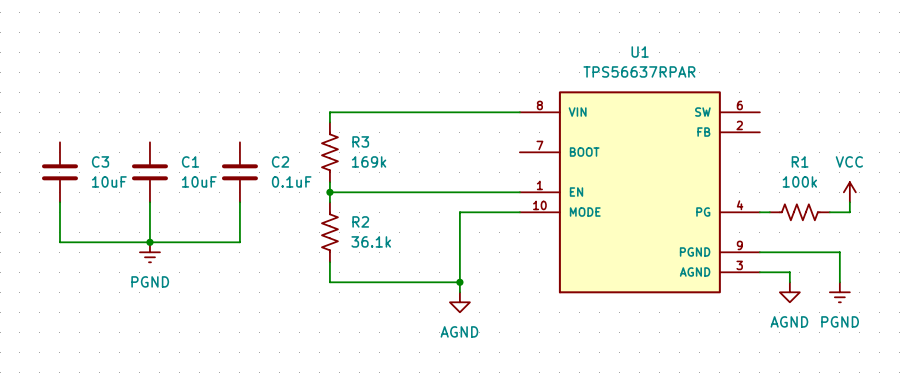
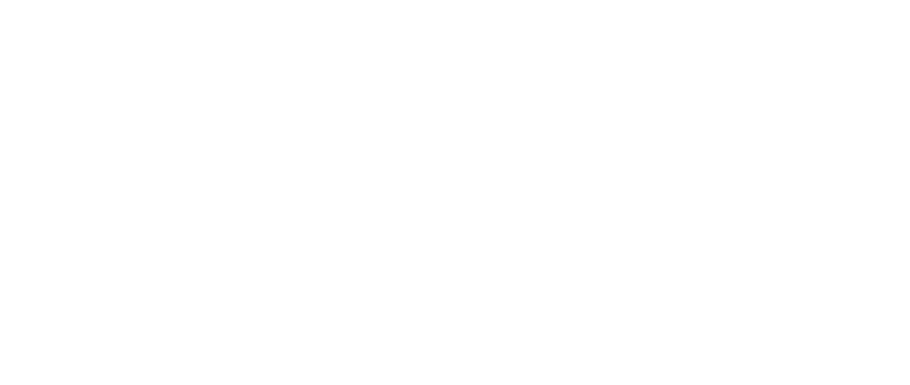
wire: (519, 112) (329, 112) (329, 122) -> none
R3: 169k (329, 152) -> none
C3: 10uF (59, 172) -> none
C1: 10uF (149, 172) -> none
C2: 0.1uF (239, 172) -> none
wire: (329, 182) (329, 202) -> none
wire: (329, 192) (519, 192) -> none
junction: (329, 192) -> none
U1: TPS56637RPAR (639, 192) -> none
power symbol: VCC (849, 192) -> none
wire: (59, 202) (59, 242) (239, 242) (239, 202) -> none
wire: (149, 202) (149, 242) -> none
wire: (849, 202) (849, 212) (829, 212) -> none
wire: (519, 212) (459, 212) (459, 292) -> none
wire: (759, 212) (769, 212) -> none
R1: 100k (799, 212) -> none
R2: 36.1k (329, 232) -> none
junction: (149, 242) -> none
power symbol: PGND (149, 252) -> none
wire: (759, 252) (839, 252) (839, 282) -> none
wire: (329, 262) (329, 282) (459, 282) -> none
wire: (759, 272) (789, 272) (789, 282) -> none
junction: (459, 282) -> none
power symbol: AGND (789, 292) -> none
power symbol: PGND (839, 292) -> none
power symbol: AGND (459, 302) -> none

